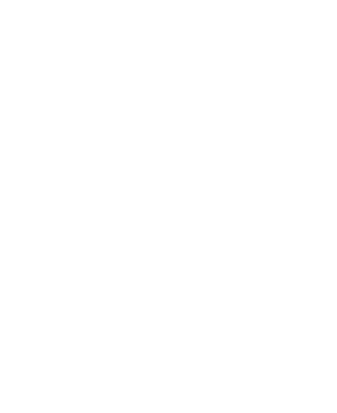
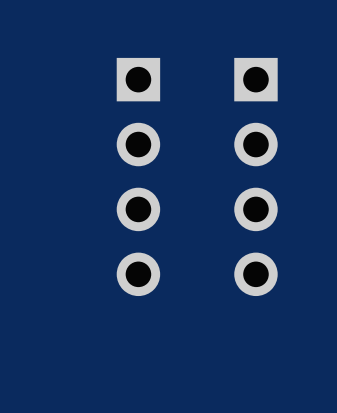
part: none -> (138, 176)
part: none -> (255, 176)

